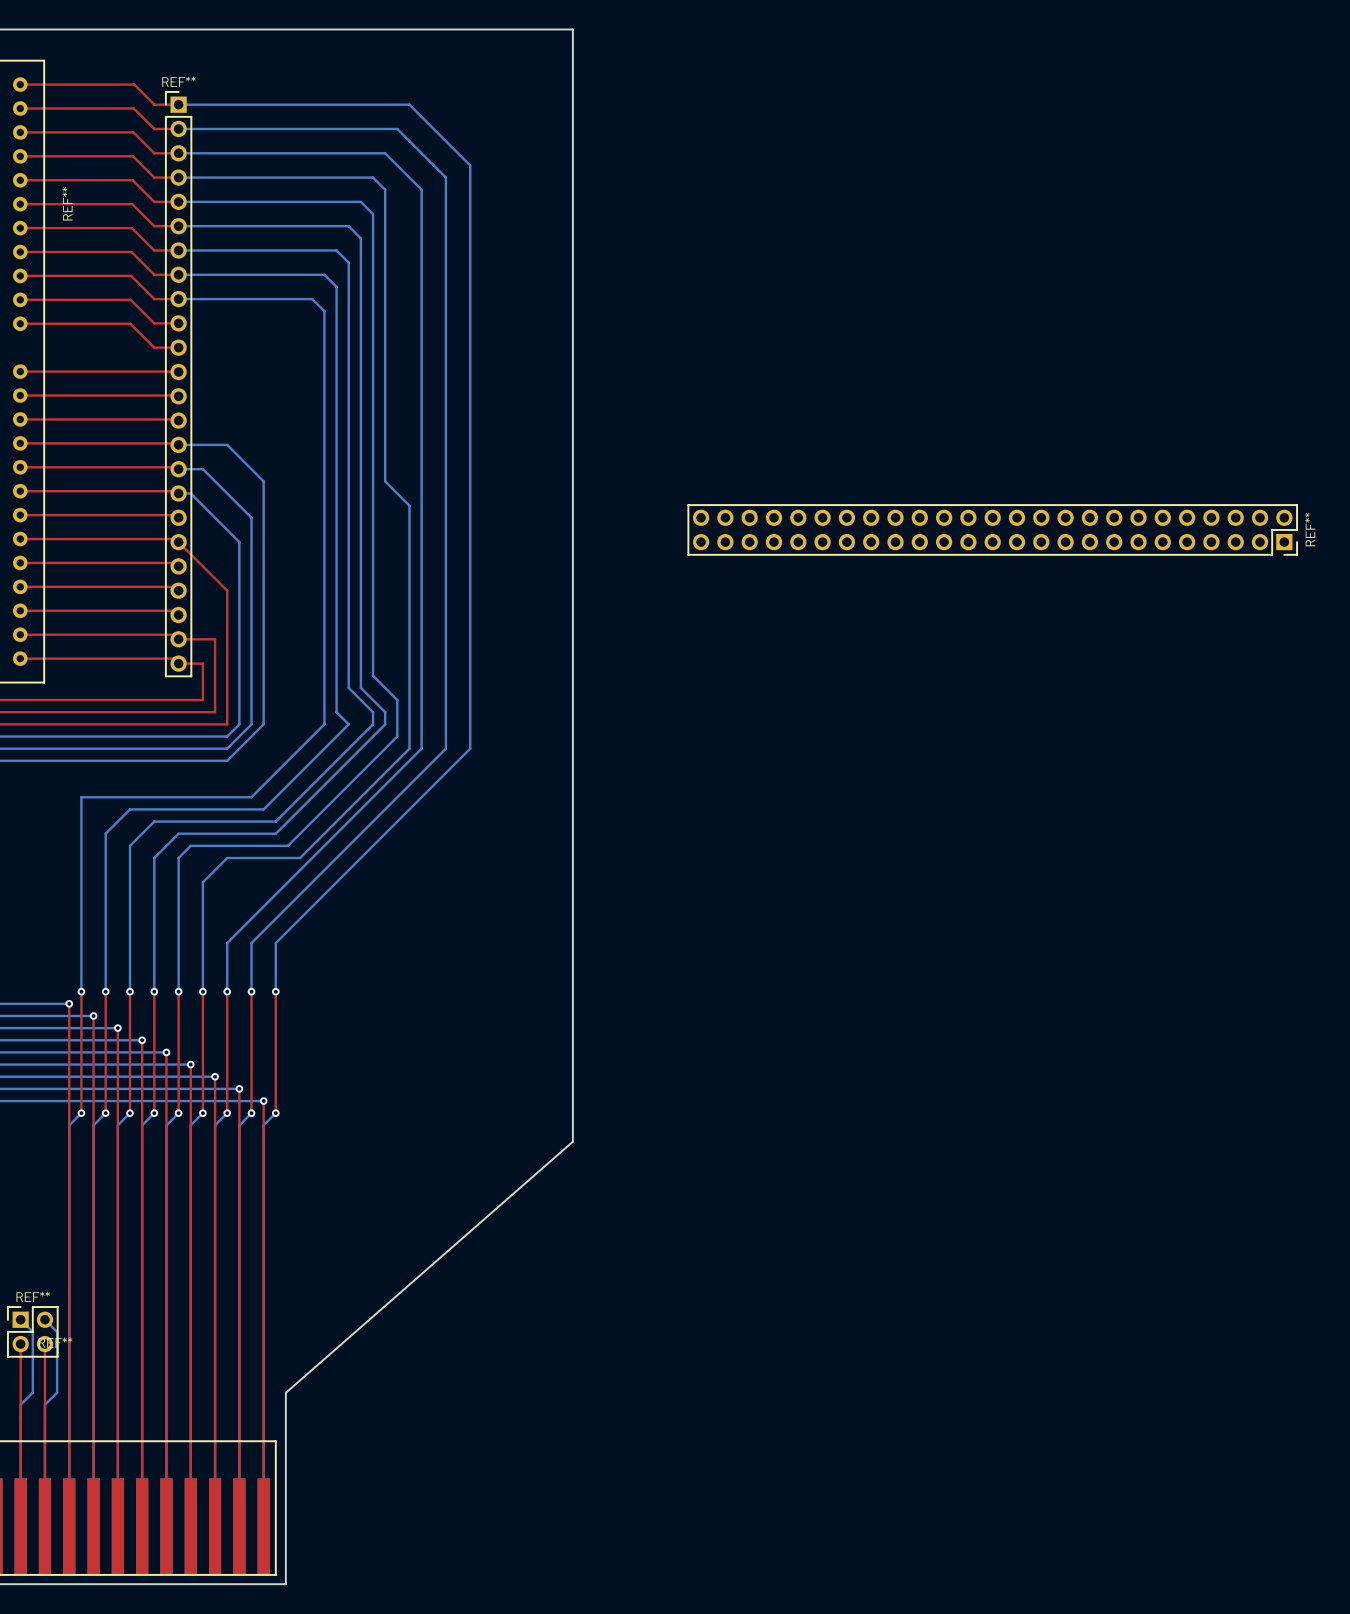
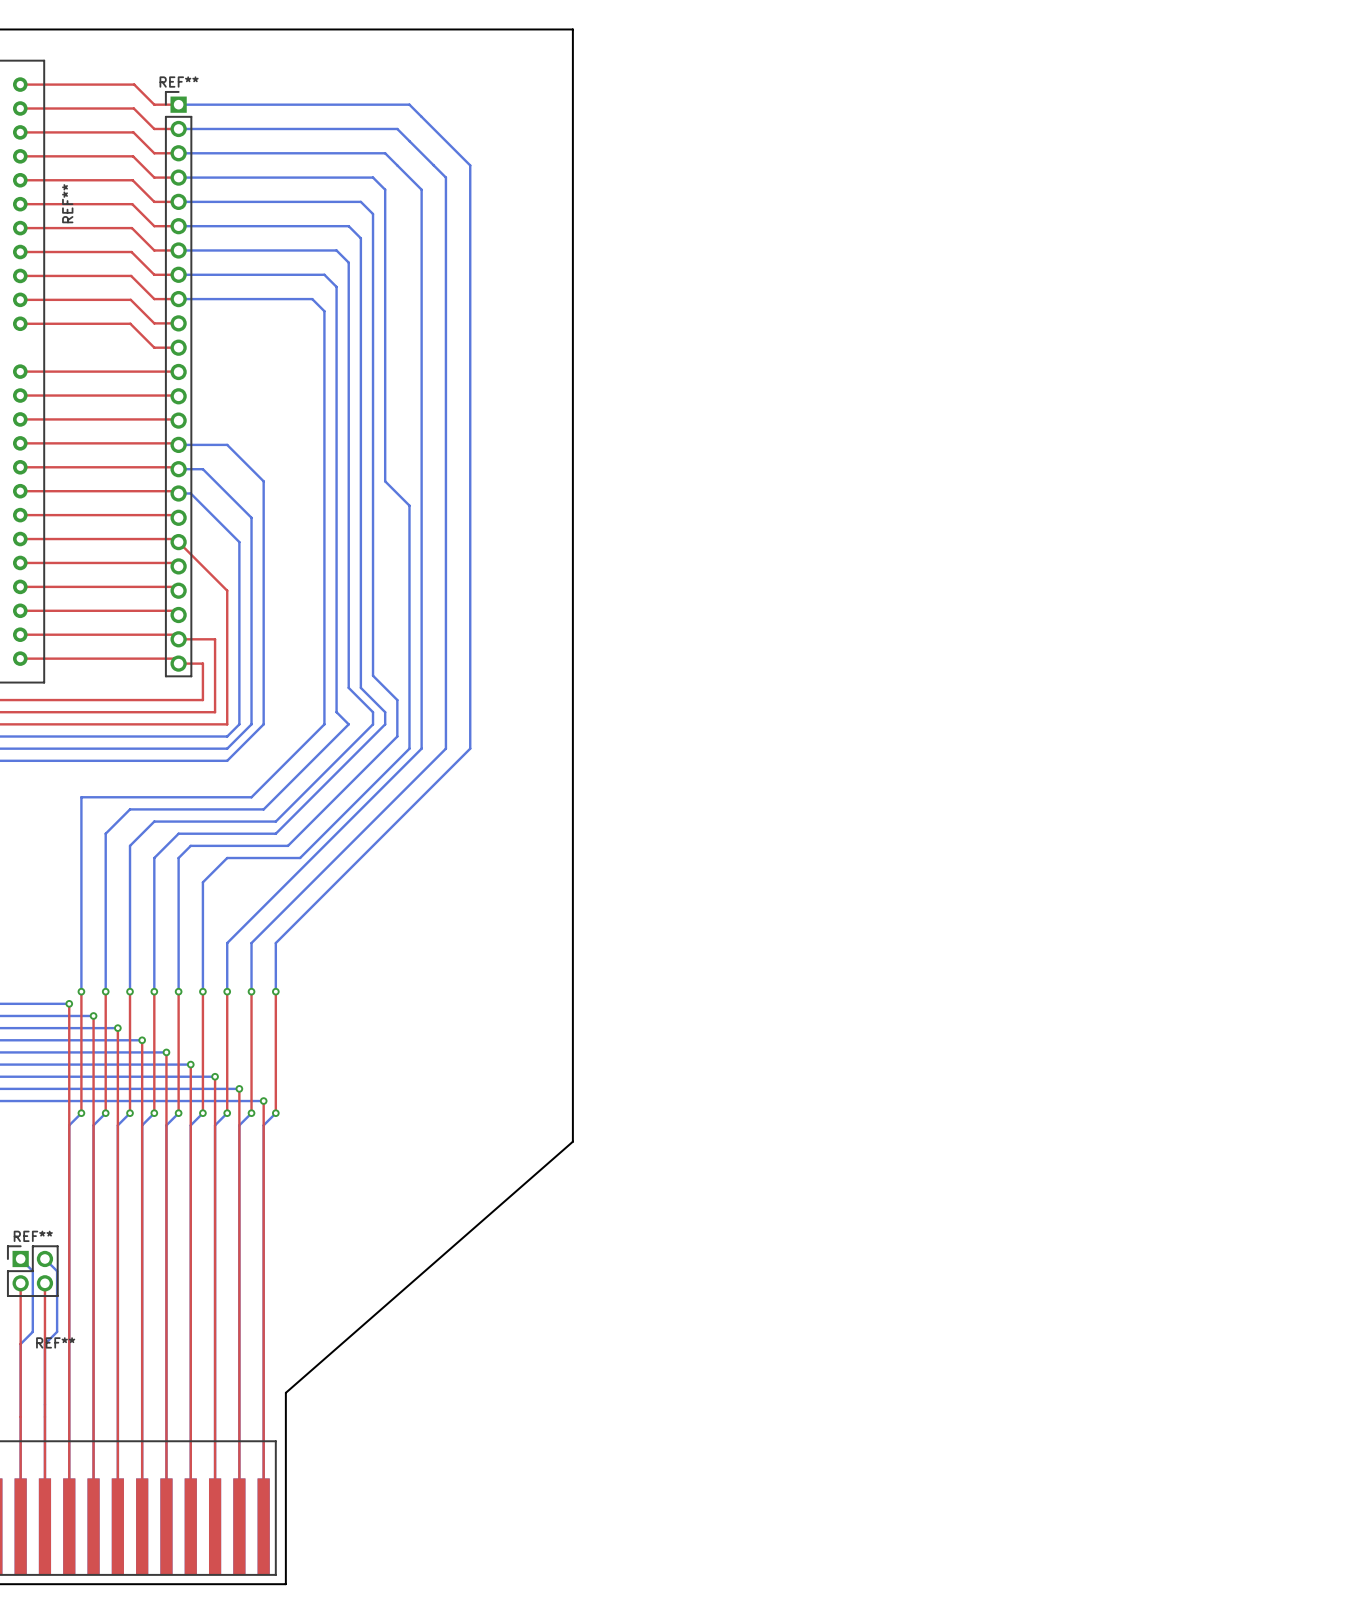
REF**: (992, 529) -> none
top track: none -> (20, 1283) (20, 1344)
top track: none -> (44, 1283) (44, 1344)
bottom track: (20, 1319) (32, 1331) (32, 1392) (20, 1404) -> (20, 1258) (32, 1271) (32, 1331) (20, 1344) (20, 1404)
bottom track: (44, 1319) (57, 1331) (57, 1392) (44, 1404) -> (44, 1258) (57, 1271) (57, 1331) (44, 1344) (44, 1404)
REF** position: (32, 1331) -> (32, 1271)

